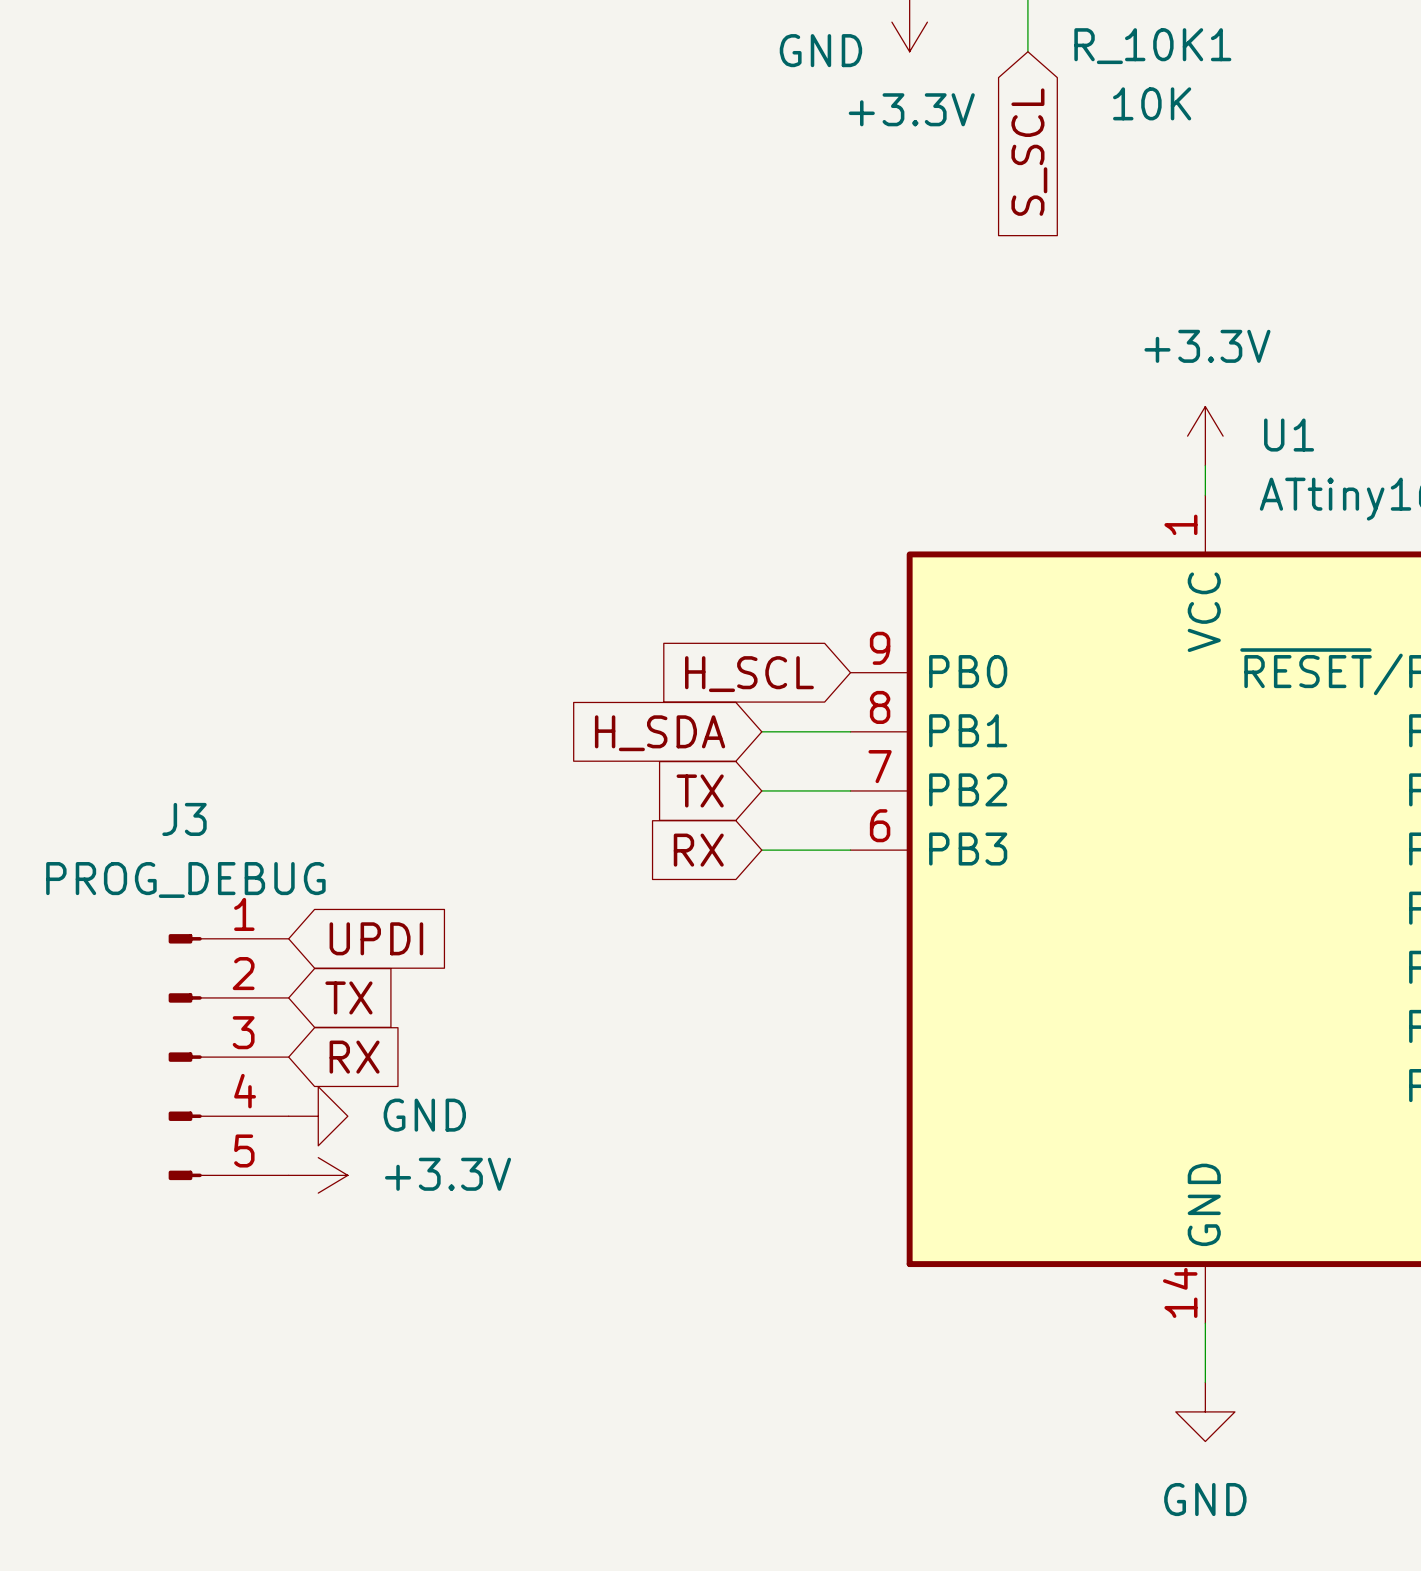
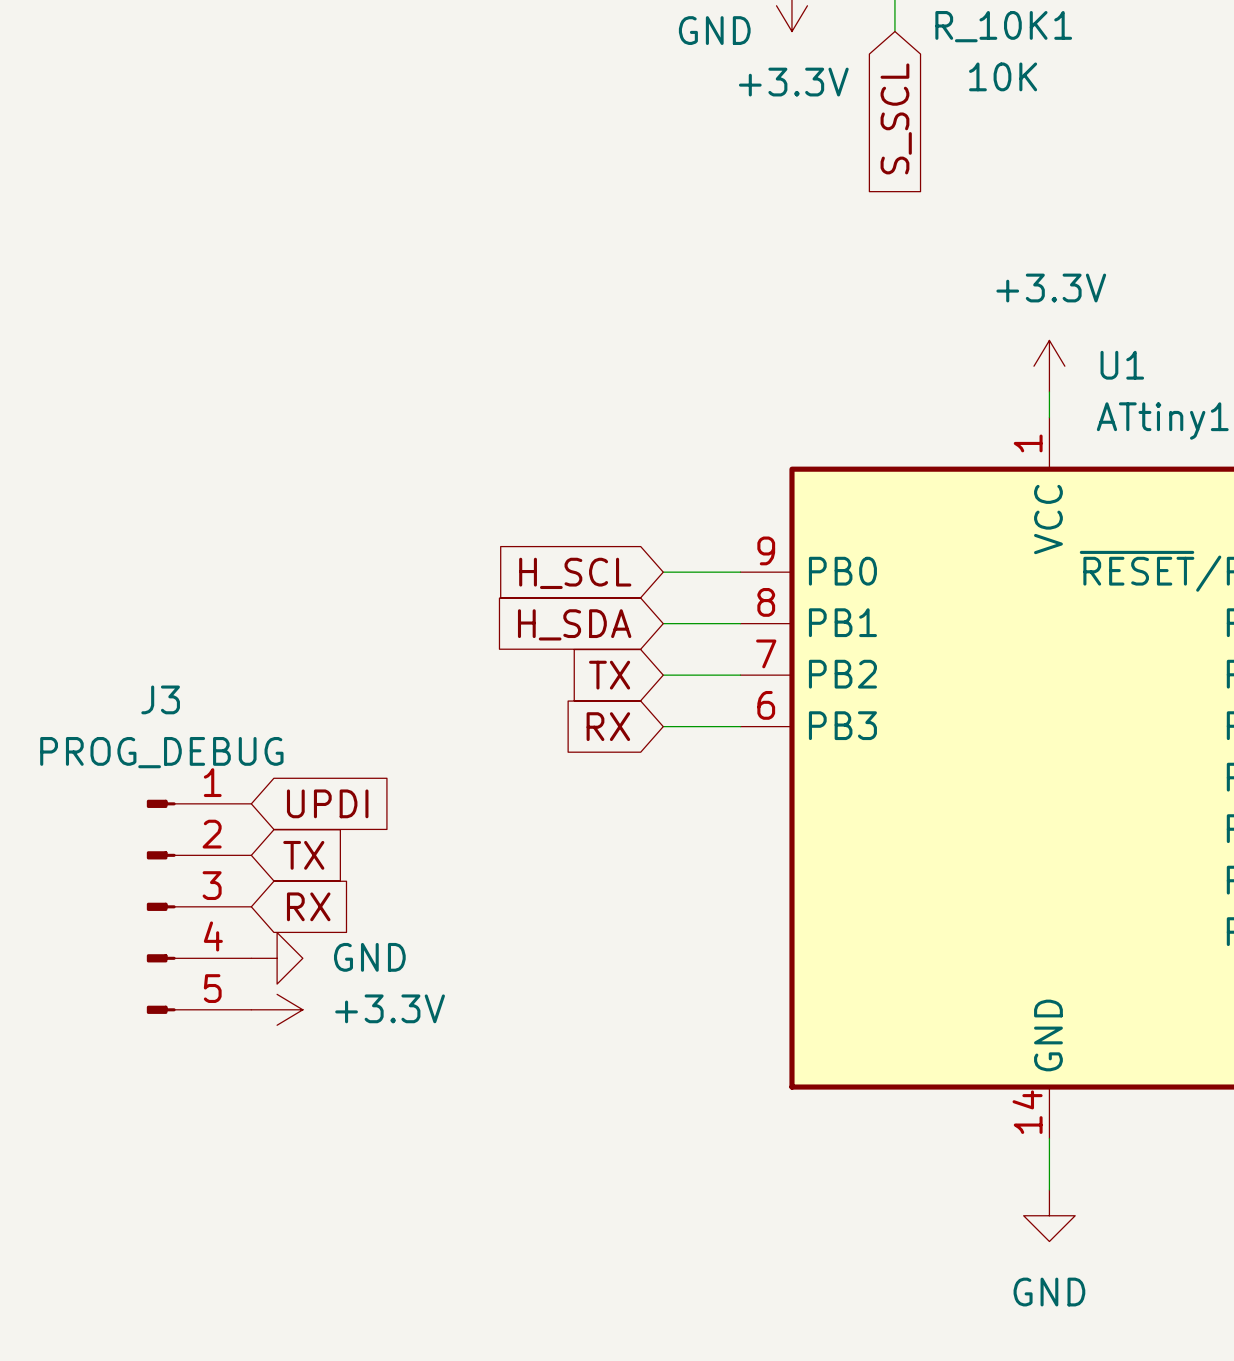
wire: none -> (663, 572) (740, 572)
global label position: H_SCL (749, 674) -> H_SCL (575, 573)

